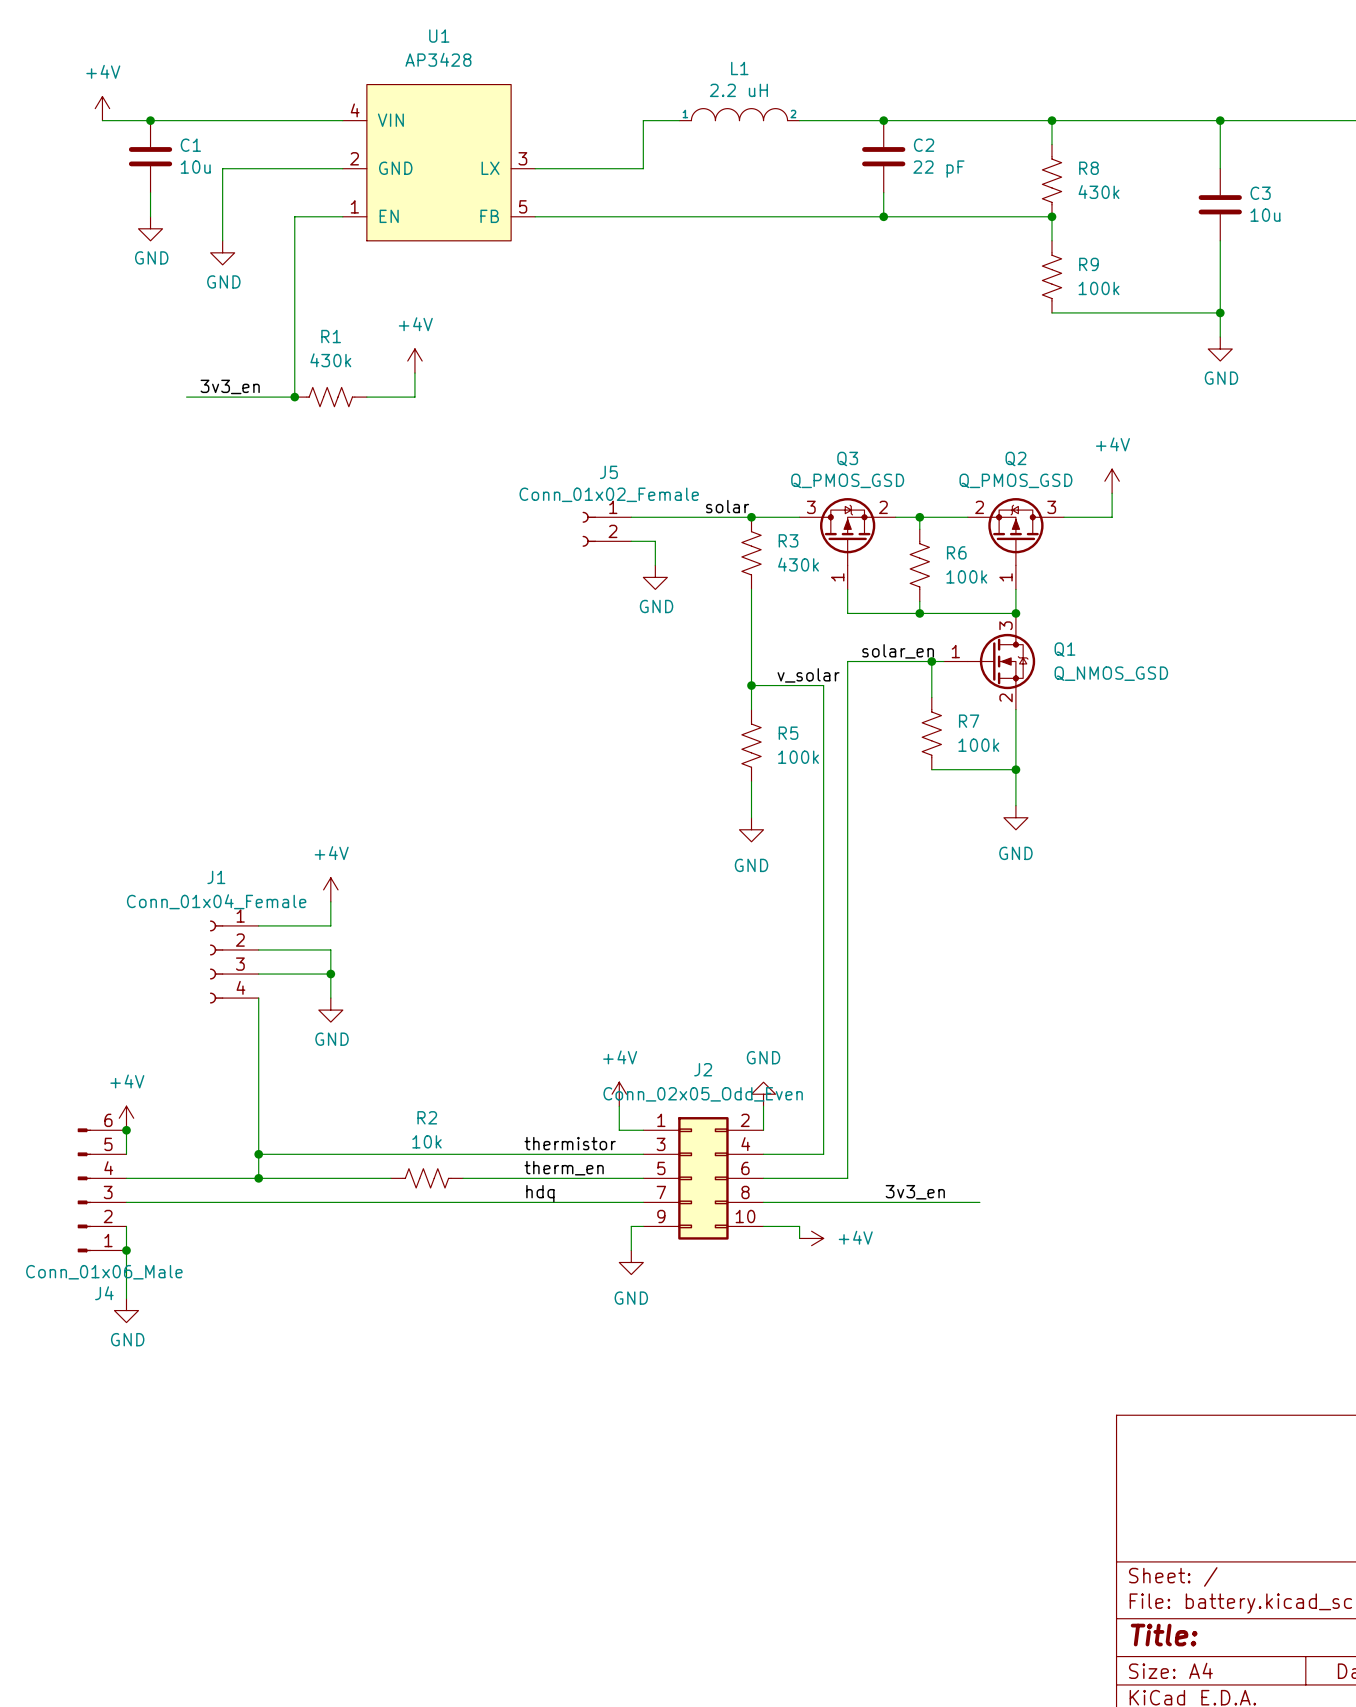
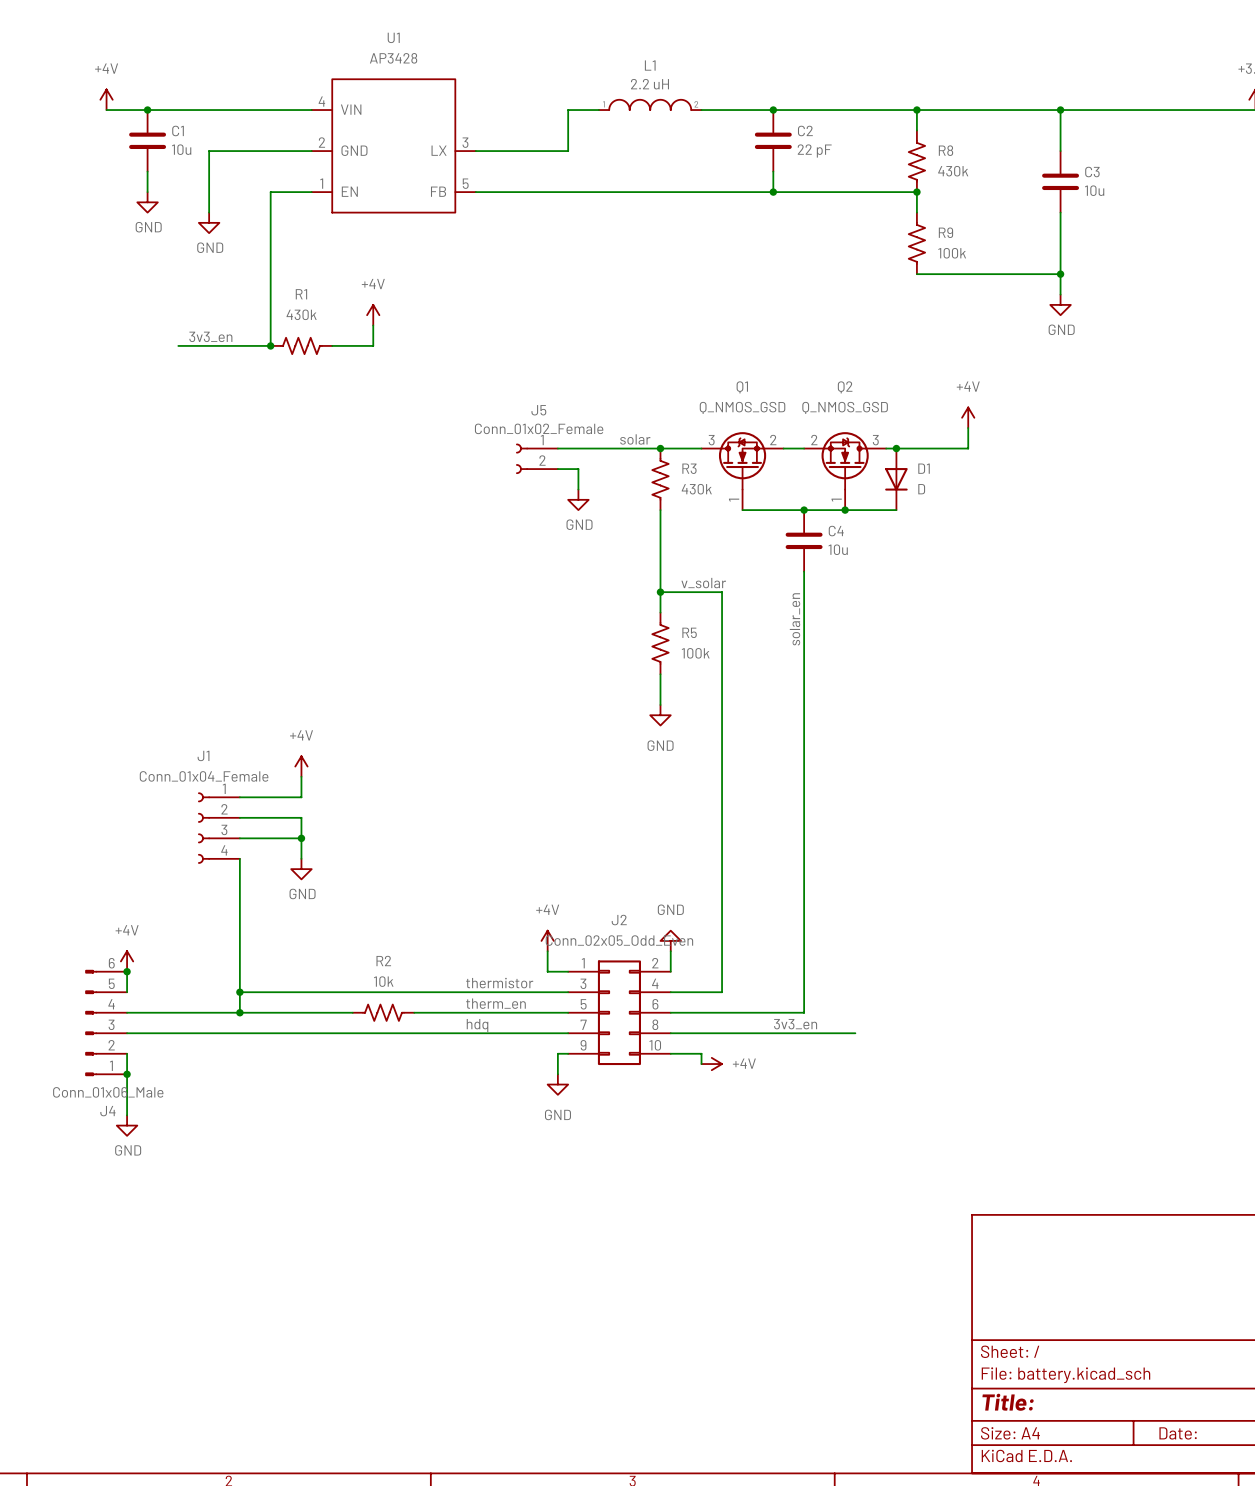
Q2 value: Q_PMOS_GSD (1015, 480) -> Q_NMOS_GSD (845, 407)
Q2 symbol: [967, 498, 1065, 590] -> [804, 432, 887, 511]
junction: (919, 517) -> none
junction: none -> (896, 448)
Q3: Q_PMOS_GSD (847, 543) -> none
D1: none -> D (896, 479)
R6: 100k (919, 565) -> none
wire: (847, 589) (847, 613) (1015, 613) (1015, 589) -> (742, 510) (896, 510)
junction: none -> (845, 510)
junction position: (919, 613) -> (804, 510)
junction: (1015, 613) -> none
C4: none -> 10u (804, 540)
Q1 name position: Q1 (1064, 649) -> Q1 (742, 387)
label rotation: 0° (898, 651) -> 90° counterclockwise (795, 619)
wire: (931, 661) (931, 697) -> none
junction: (931, 661) -> none
wire: (943, 661) (847, 661) (847, 1178) -> (804, 571) (804, 1012) (742, 1012)
Q1 position: (989, 661) -> (742, 471)
Q1 rotation: 0° (1001, 661) -> 90° counterclockwise (742, 460)
Q1 value position: Q_NMOS_GSD (1111, 673) -> Q_NMOS_GSD (742, 407)
wire: (1015, 709) (1015, 805) -> none
R7: 100k (931, 733) -> none
wire: (931, 769) (1015, 769) -> none
junction: (1015, 769) -> none
power symbol: GND (1015, 817) -> none

